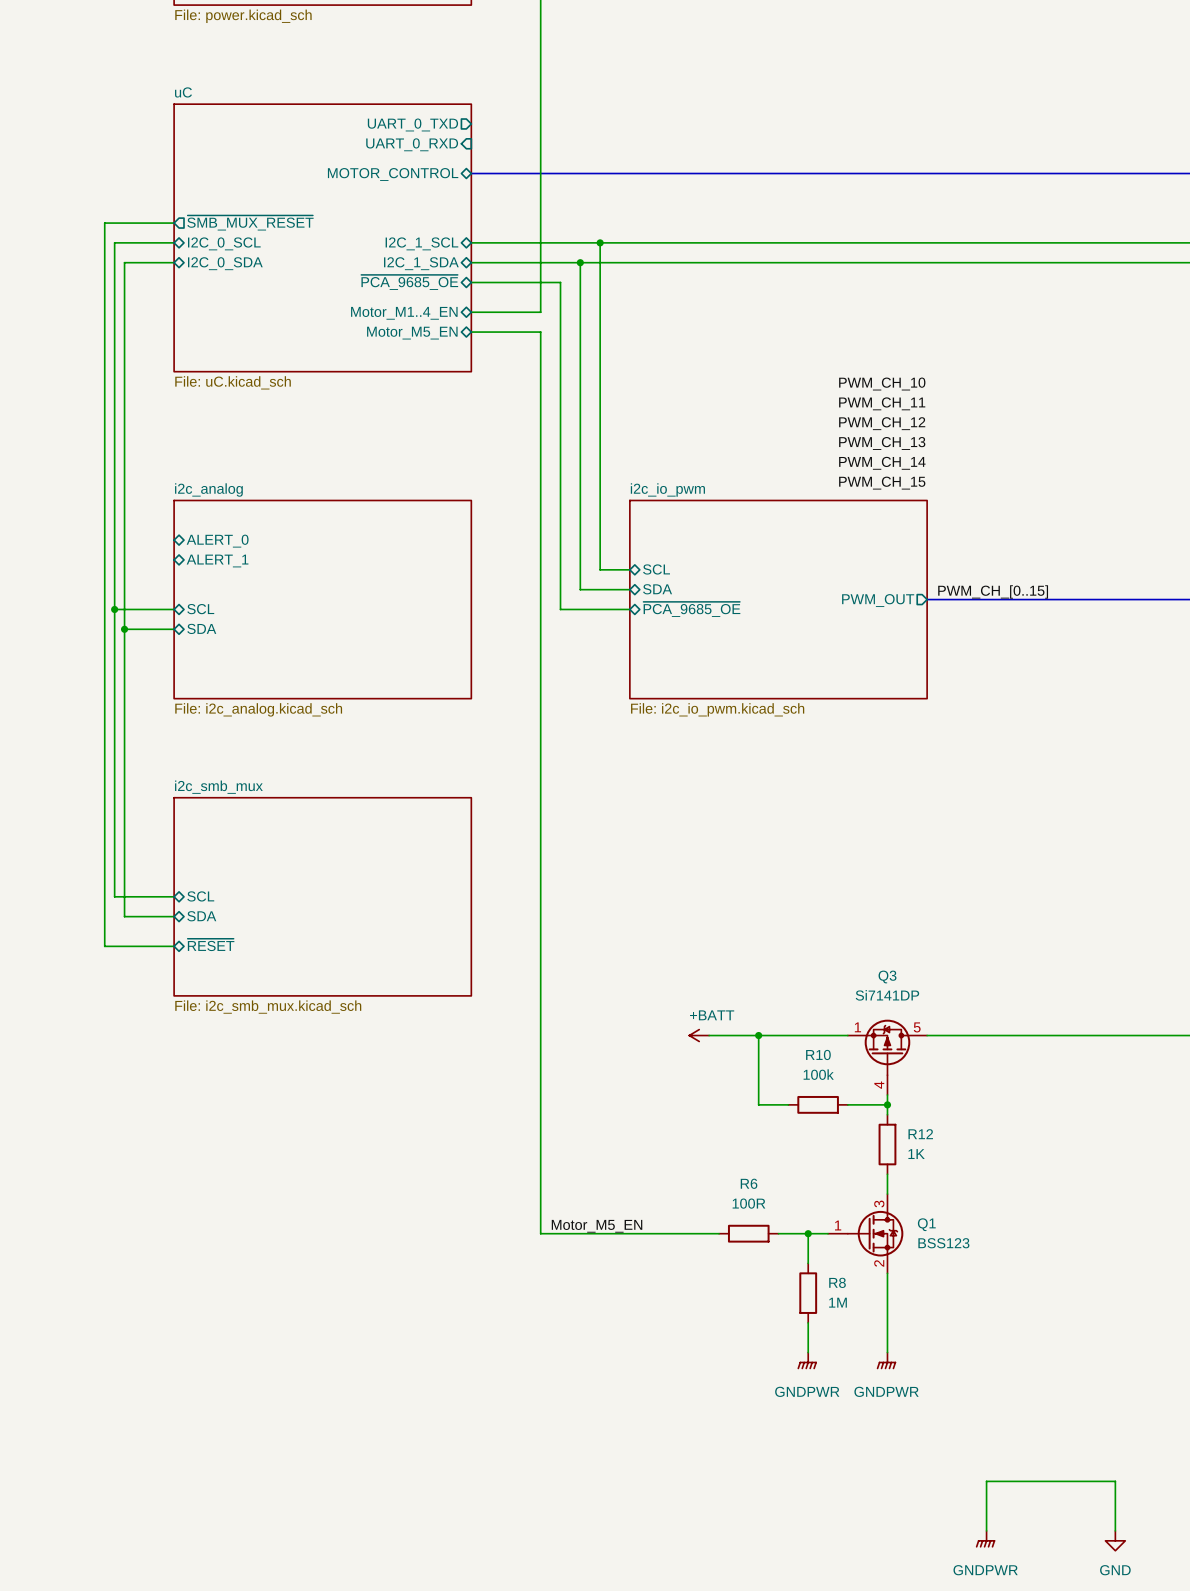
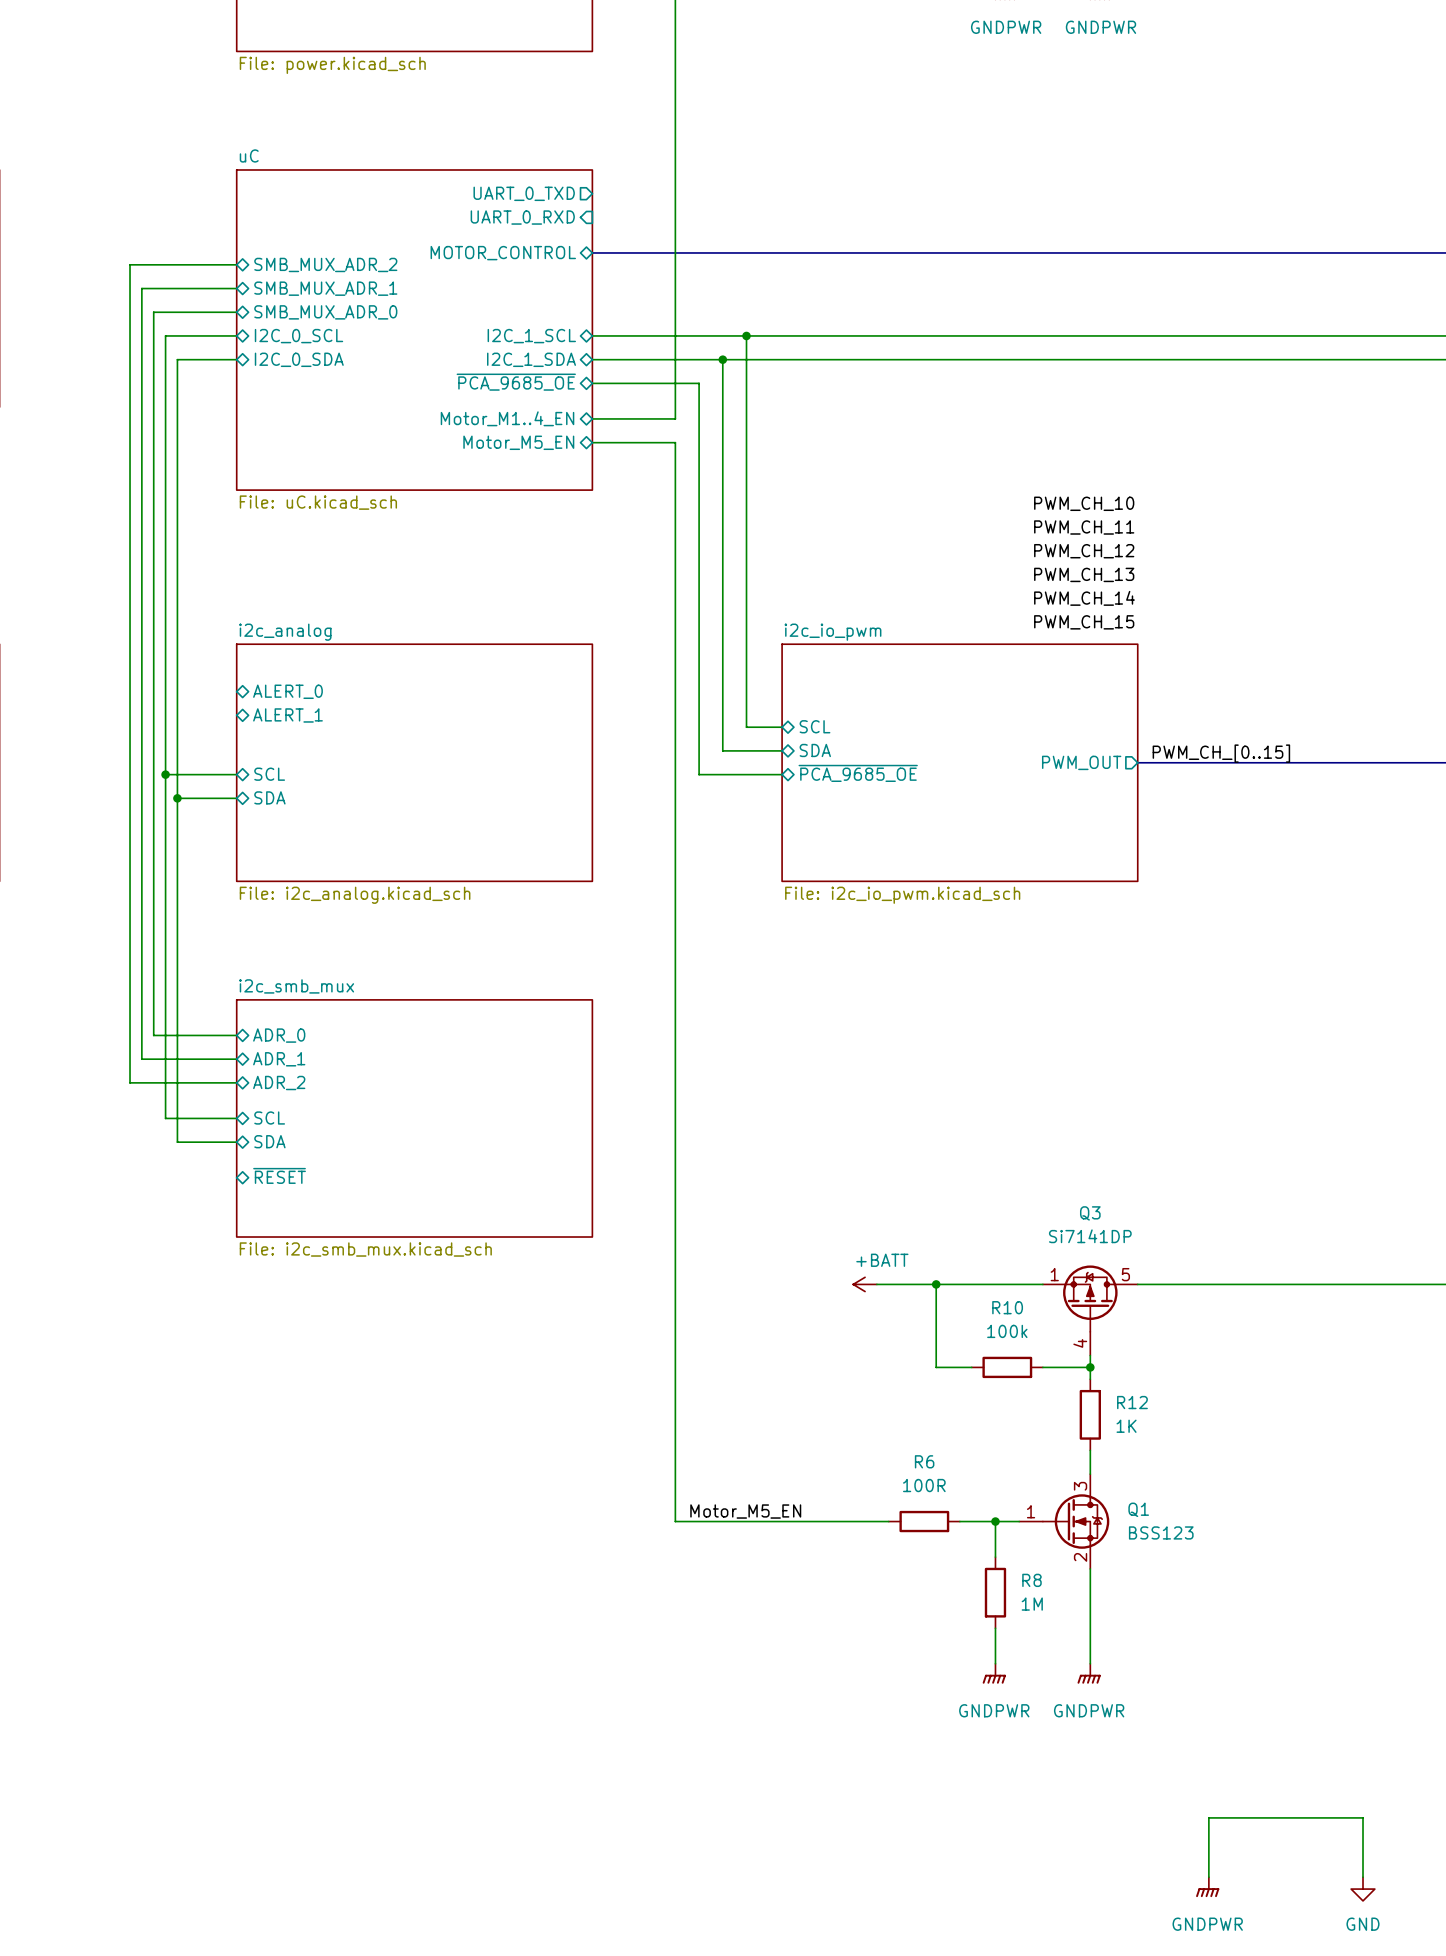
wire: none -> (236, 264) (130, 264) (130, 1082) (236, 1082)
sheet pin: none -> SMB_MUX_ADR_2 (325, 264)
wire: none -> (236, 288) (141, 288) (141, 1059) (236, 1059)
sheet pin: none -> SMB_MUX_ADR_1 (325, 288)
sheet pin shape: output (250, 222) -> bidirectional (325, 312)
sheet pin: ~{SMB_MUX_RESET} (250, 222) -> SMB_MUX_ADR_0 (325, 312)
wire: (104, 827) (104, 946) (174, 946) -> (153, 1035) (236, 1035)
sheet pin: none -> ADR_0 (279, 1035)
sheet pin: none -> ADR_1 (279, 1059)
sheet pin: none -> ADR_2 (279, 1083)

